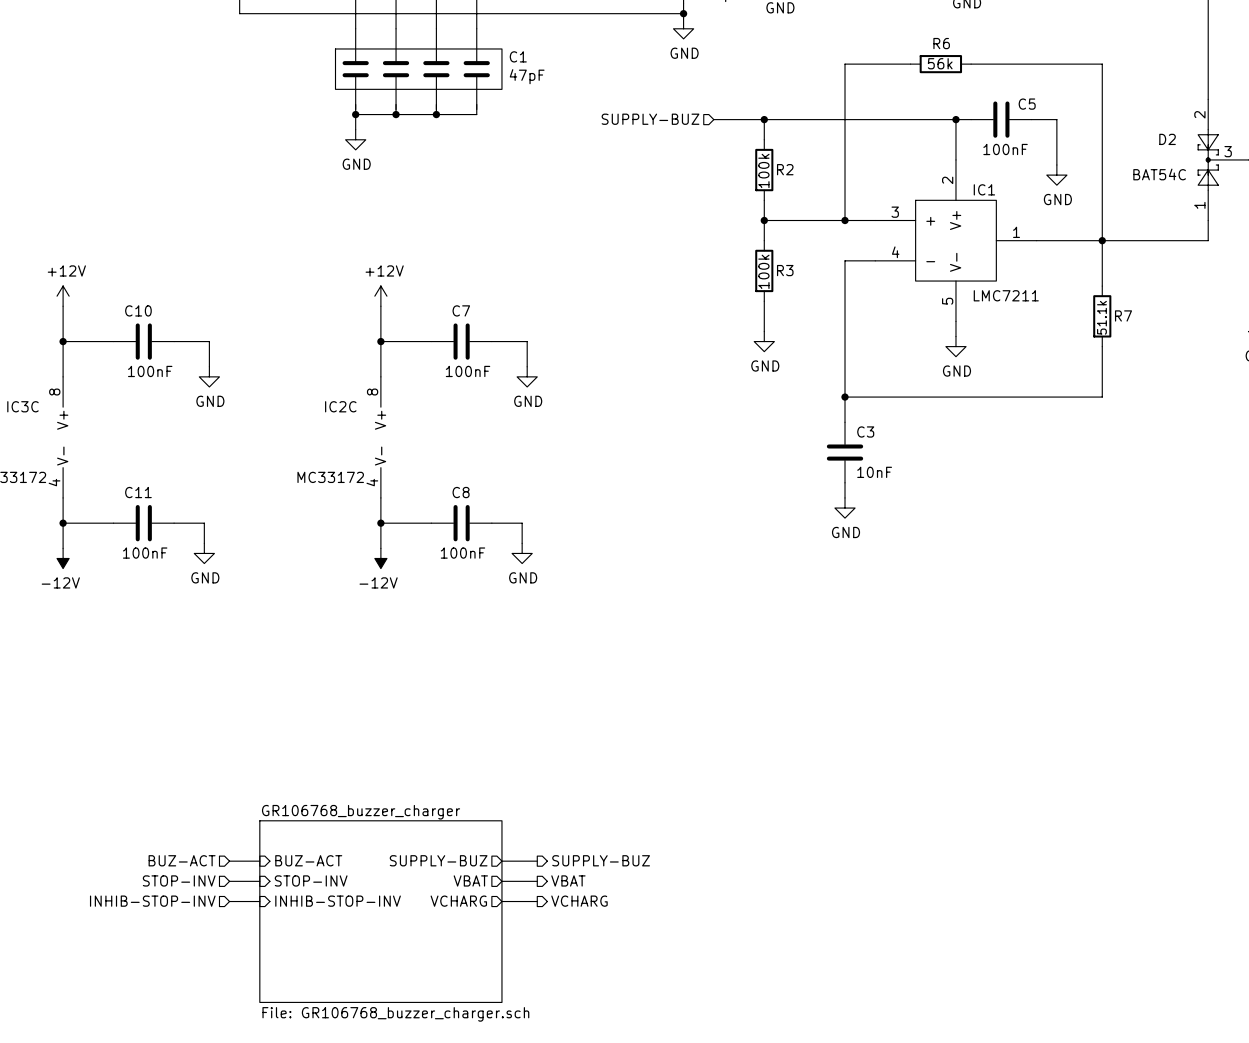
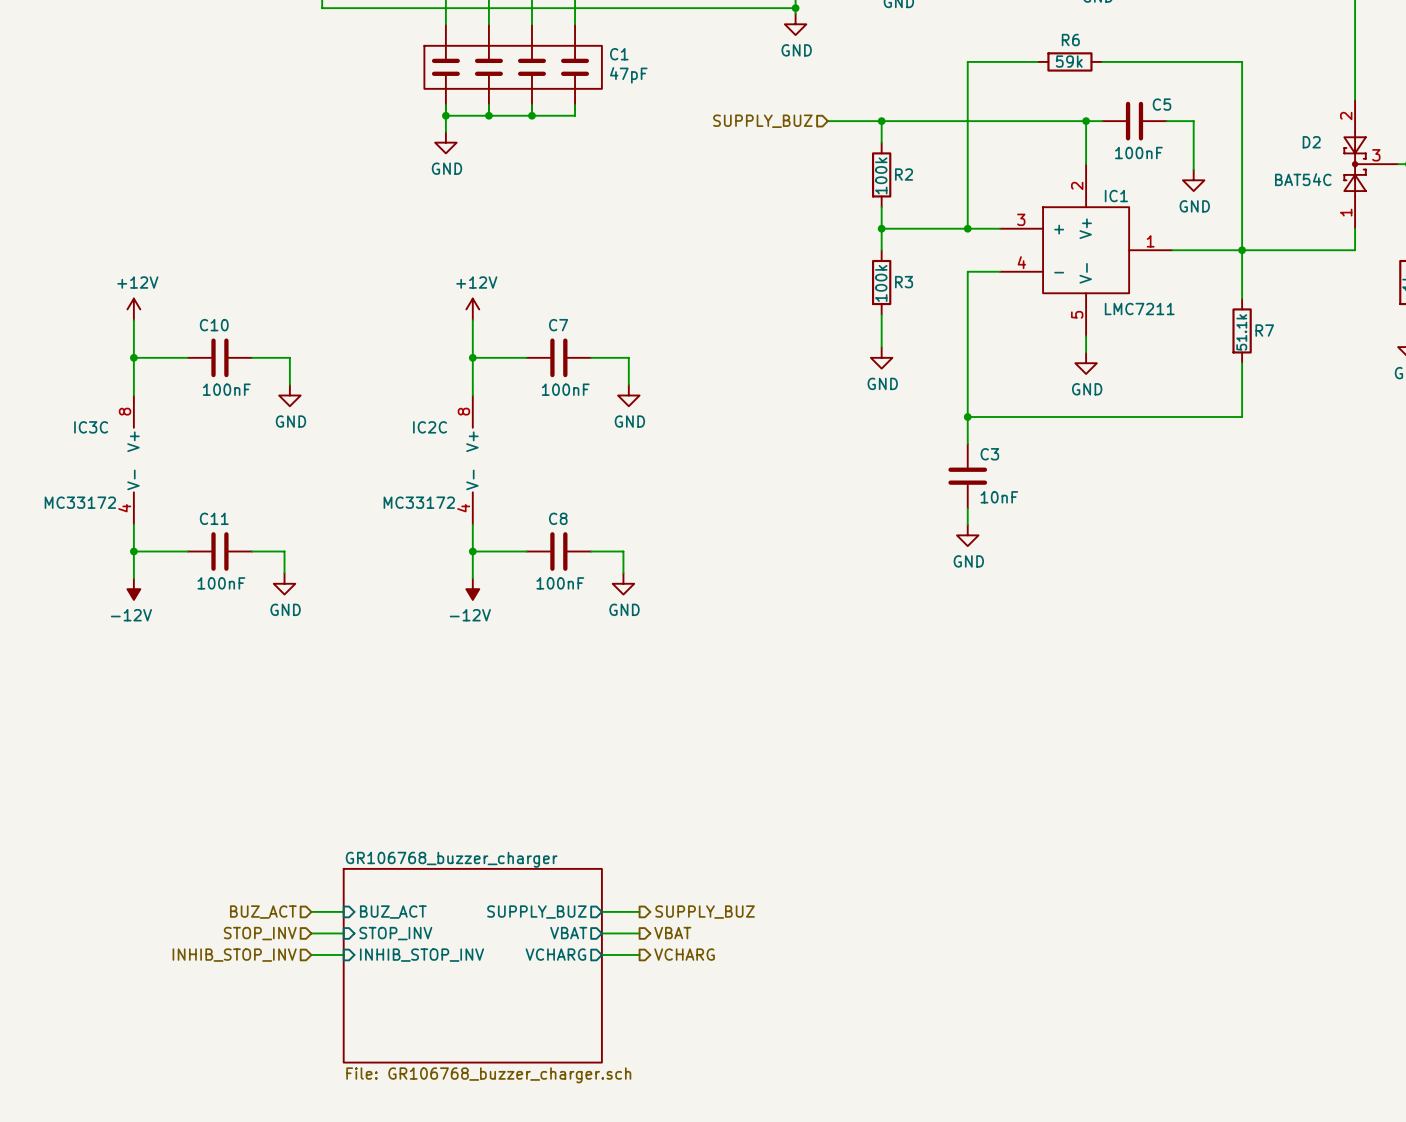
R6 value: 56k (940, 63) -> 59k (1069, 61)
hierarchical label: SUPPLY-BUZ (650, 119) -> SUPPLY_BUZ (762, 121)
hierarchical label: BUZ-ACT (182, 860) -> BUZ_ACT (263, 912)
sheet pin: BUZ-ACT (308, 860) -> BUZ_ACT (393, 912)
sheet pin: SUPPLY-BUZ (438, 860) -> SUPPLY_BUZ (536, 912)
hierarchical label: SUPPLY-BUZ (601, 860) -> SUPPLY_BUZ (705, 912)
hierarchical label: STOP-INV (179, 880) -> STOP_INV (260, 933)
sheet pin: STOP-INV (311, 880) -> STOP_INV (395, 933)
hierarchical label: INHIB-STOP-INV (152, 901) -> INHIB_STOP_INV (234, 955)
sheet pin: INHIB-STOP-INV (338, 901) -> INHIB_STOP_INV (421, 955)

